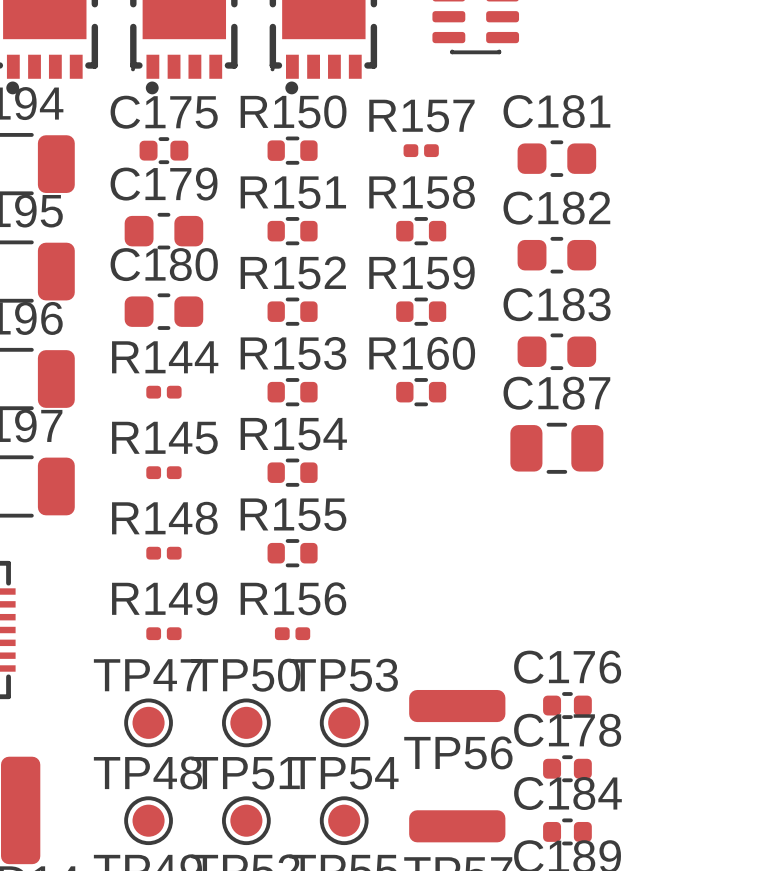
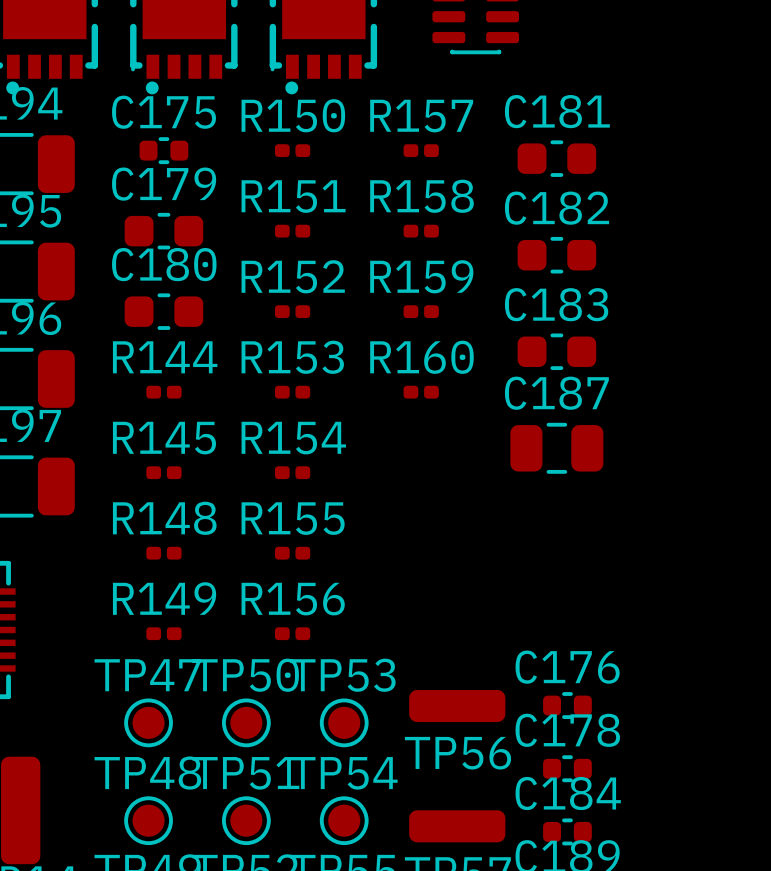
R150 footprint: [267, 136, 318, 165] -> [274, 144, 311, 158]
R151 footprint: [267, 217, 318, 246] -> [274, 224, 311, 238]
R158 footprint: [396, 217, 447, 246] -> [403, 224, 439, 238]
R152 footprint: [267, 297, 318, 326] -> [274, 305, 311, 319]
R159 footprint: [396, 297, 447, 326] -> [403, 305, 439, 319]
R153 footprint: [267, 378, 318, 407] -> [274, 385, 311, 399]
R160 footprint: [396, 378, 447, 407] -> [403, 385, 439, 399]
R154 footprint: [267, 458, 318, 487] -> [274, 466, 311, 480]
R155 footprint: [267, 539, 318, 568] -> [274, 546, 311, 560]

